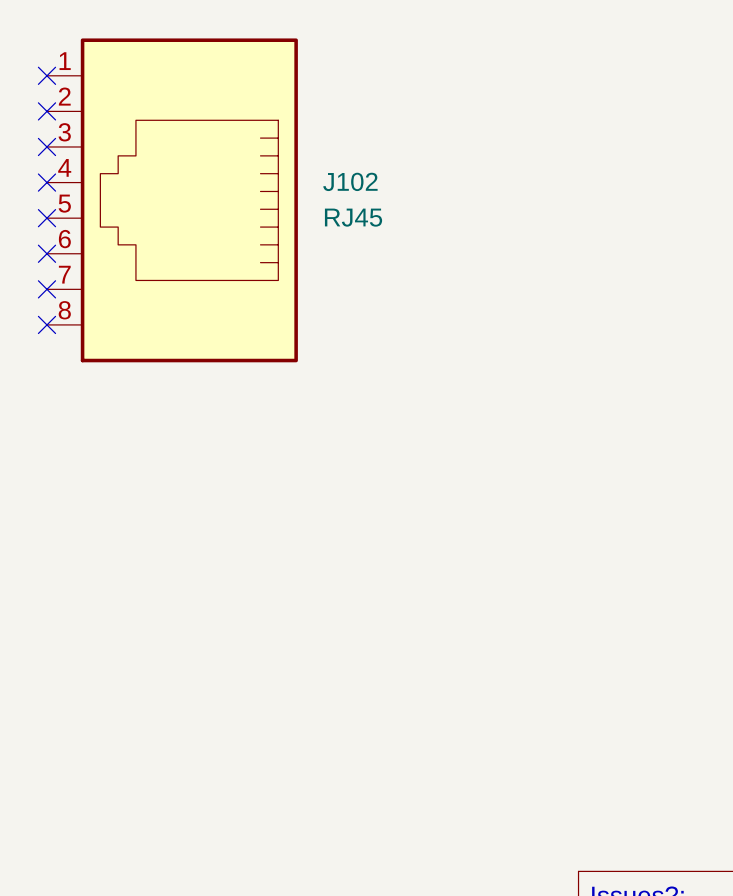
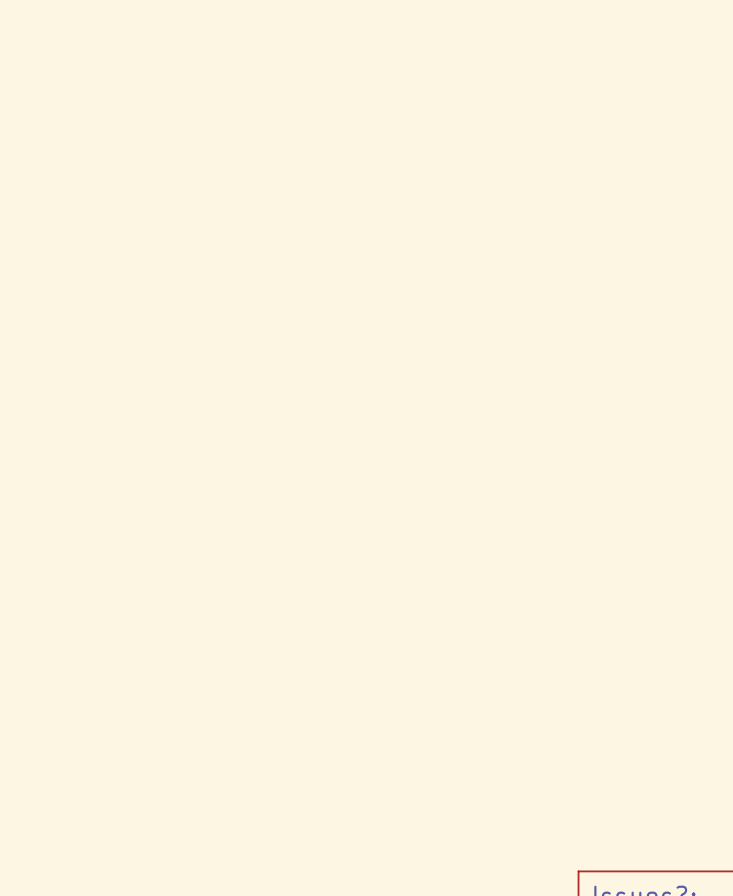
no-connect mark: (46, 75) -> none
no-connect mark: (46, 111) -> none
no-connect mark: (46, 146) -> none
no-connect mark: (46, 182) -> none
J102: RJ45 (172, 200) -> none
no-connect mark: (46, 218) -> none
no-connect mark: (46, 253) -> none
no-connect mark: (46, 289) -> none
no-connect mark: (46, 324) -> none

